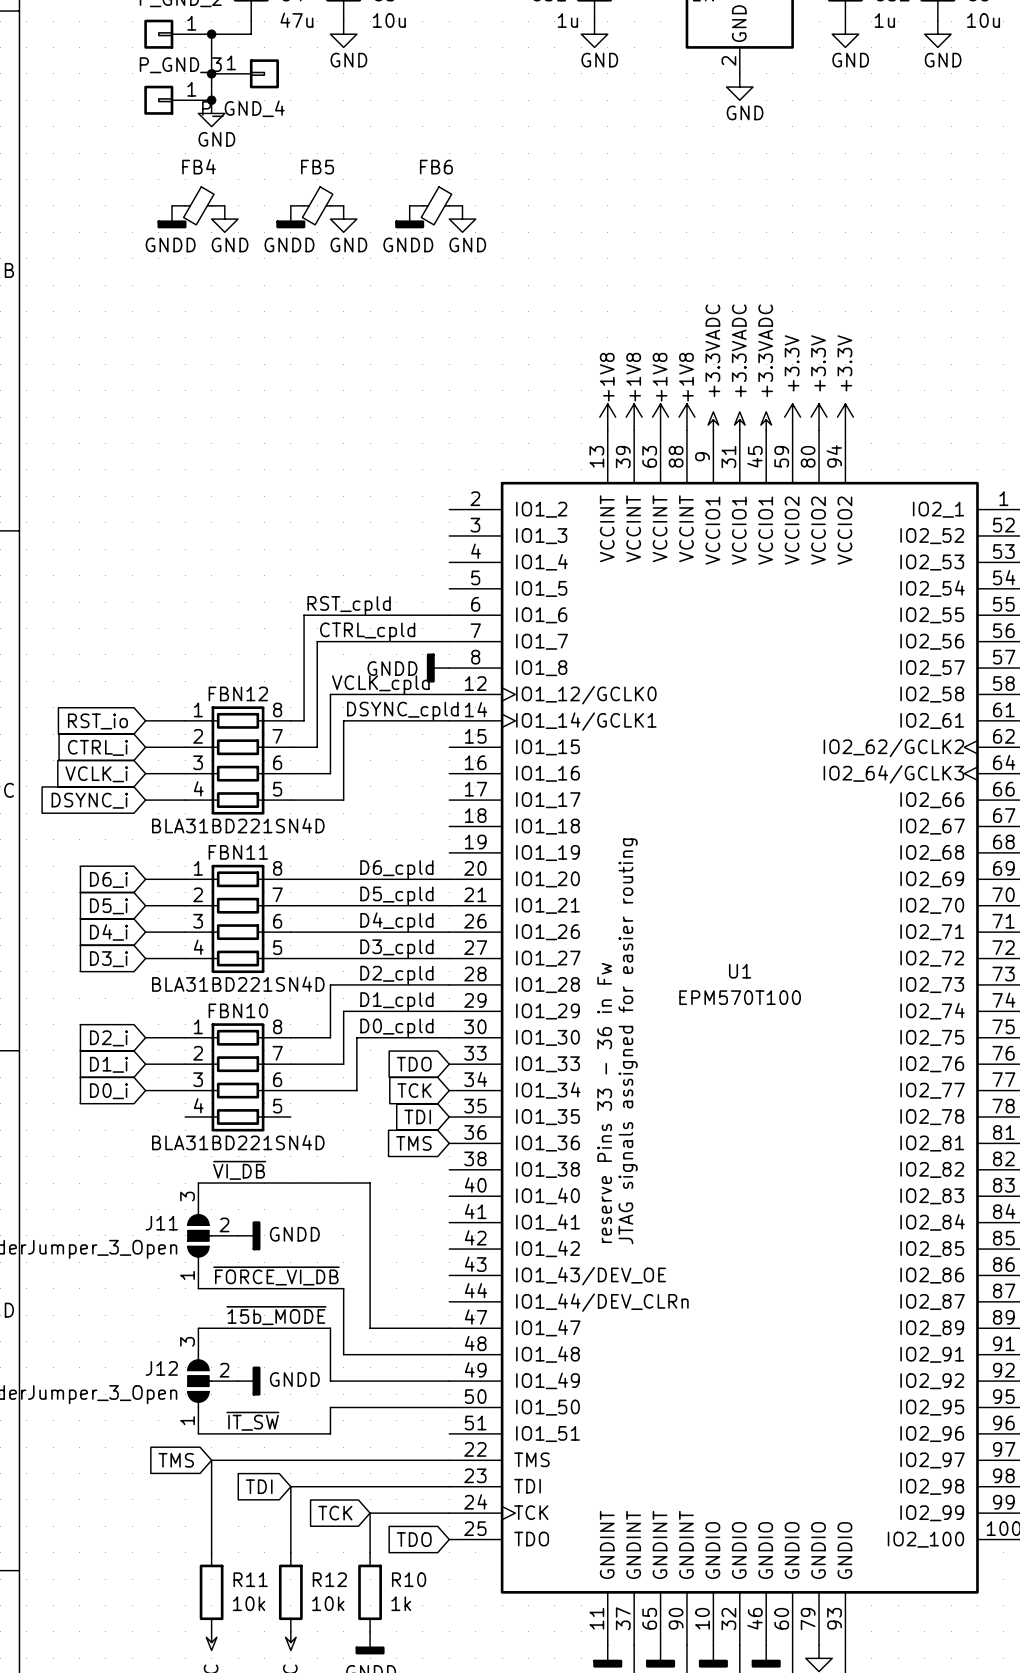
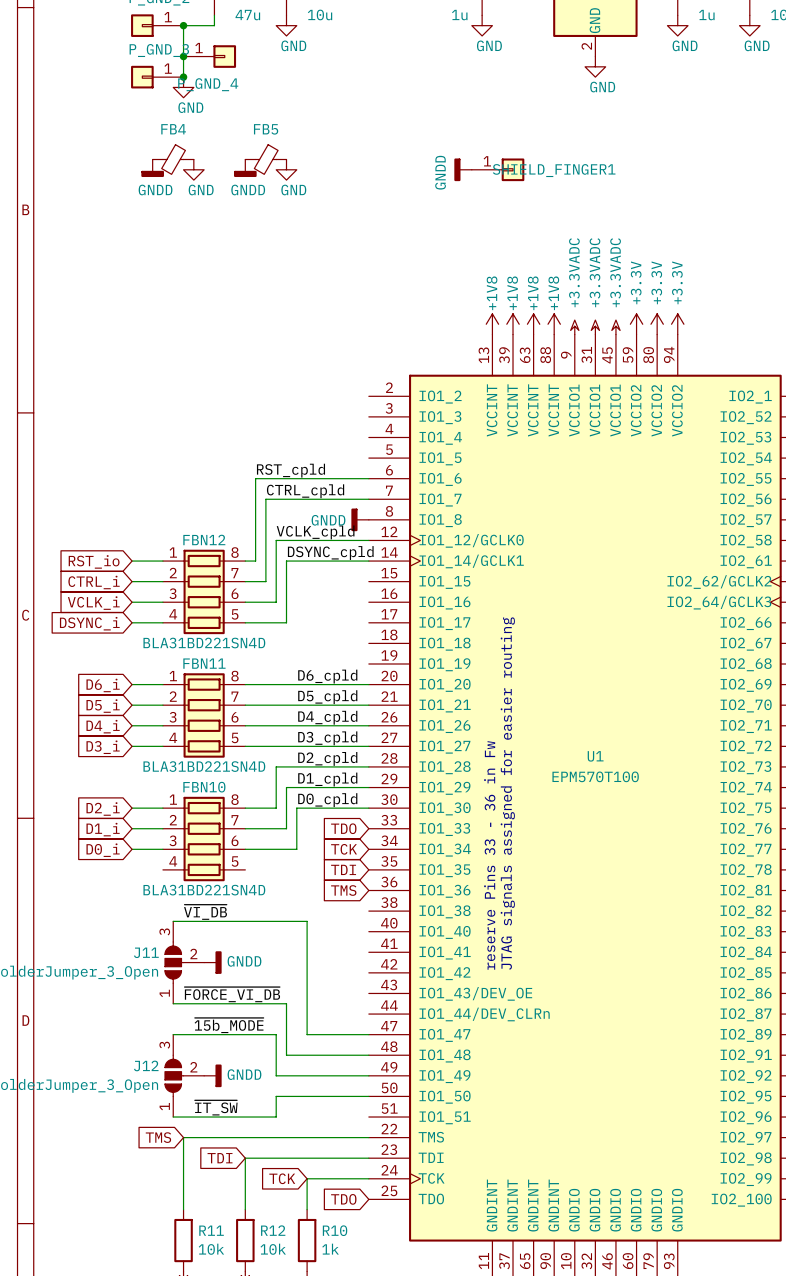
FB6: (436, 205) -> none
power symbol rotation: 0° (409, 217) -> 90° clockwise (463, 169)
power symbol position: GNDD (409, 217) -> GNDD (463, 169)
power symbol: GND (462, 219) -> none
SHIELD_FINGER1: none -> (498, 169)

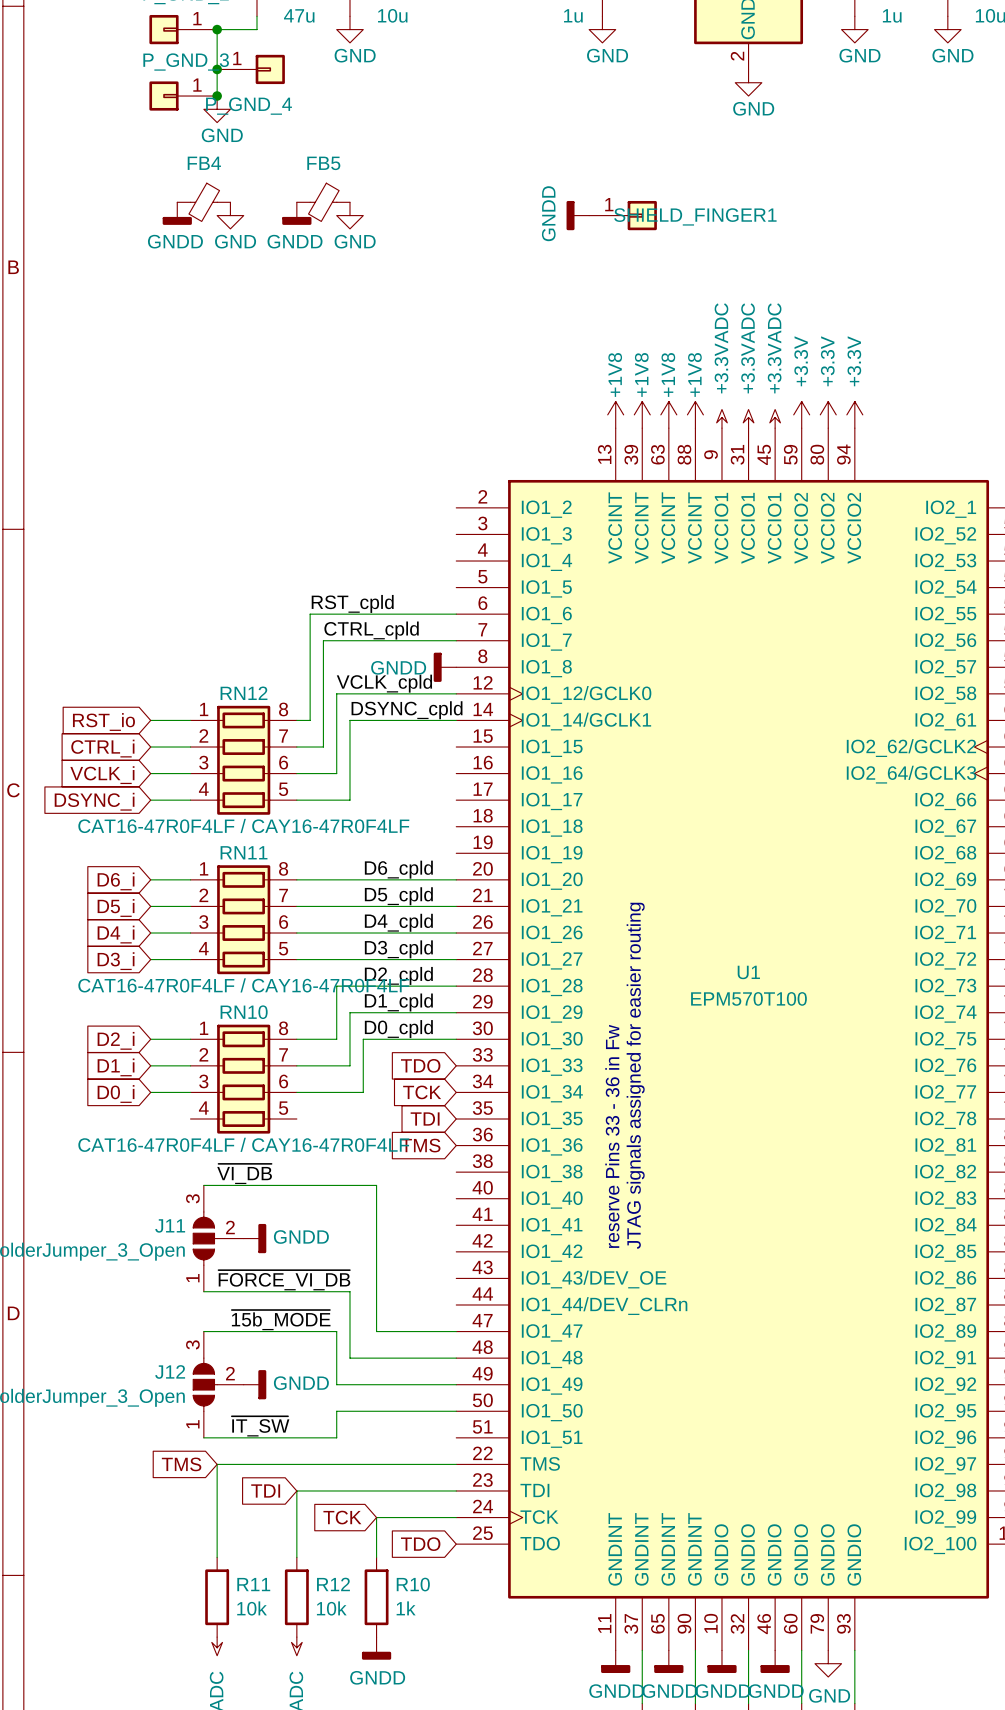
FBN12 name: FBN12 (204, 539) -> RN12 (244, 693)
FBN12 value: BLA31BD221SN4D (204, 643) -> CAT16-47R0F4LF / CAY16-47R0F4LF (243, 825)
FBN11 name: FBN11 (204, 663) -> RN11 (244, 852)
FBN11 value: BLA31BD221SN4D (204, 766) -> CAT16-47R0F4LF / CAY16-47R0F4LF (243, 985)
FBN10 name: FBN10 (204, 787) -> RN10 (244, 1012)
FBN10 value: BLA31BD221SN4D (204, 890) -> CAT16-47R0F4LF / CAY16-47R0F4LF (243, 1144)

